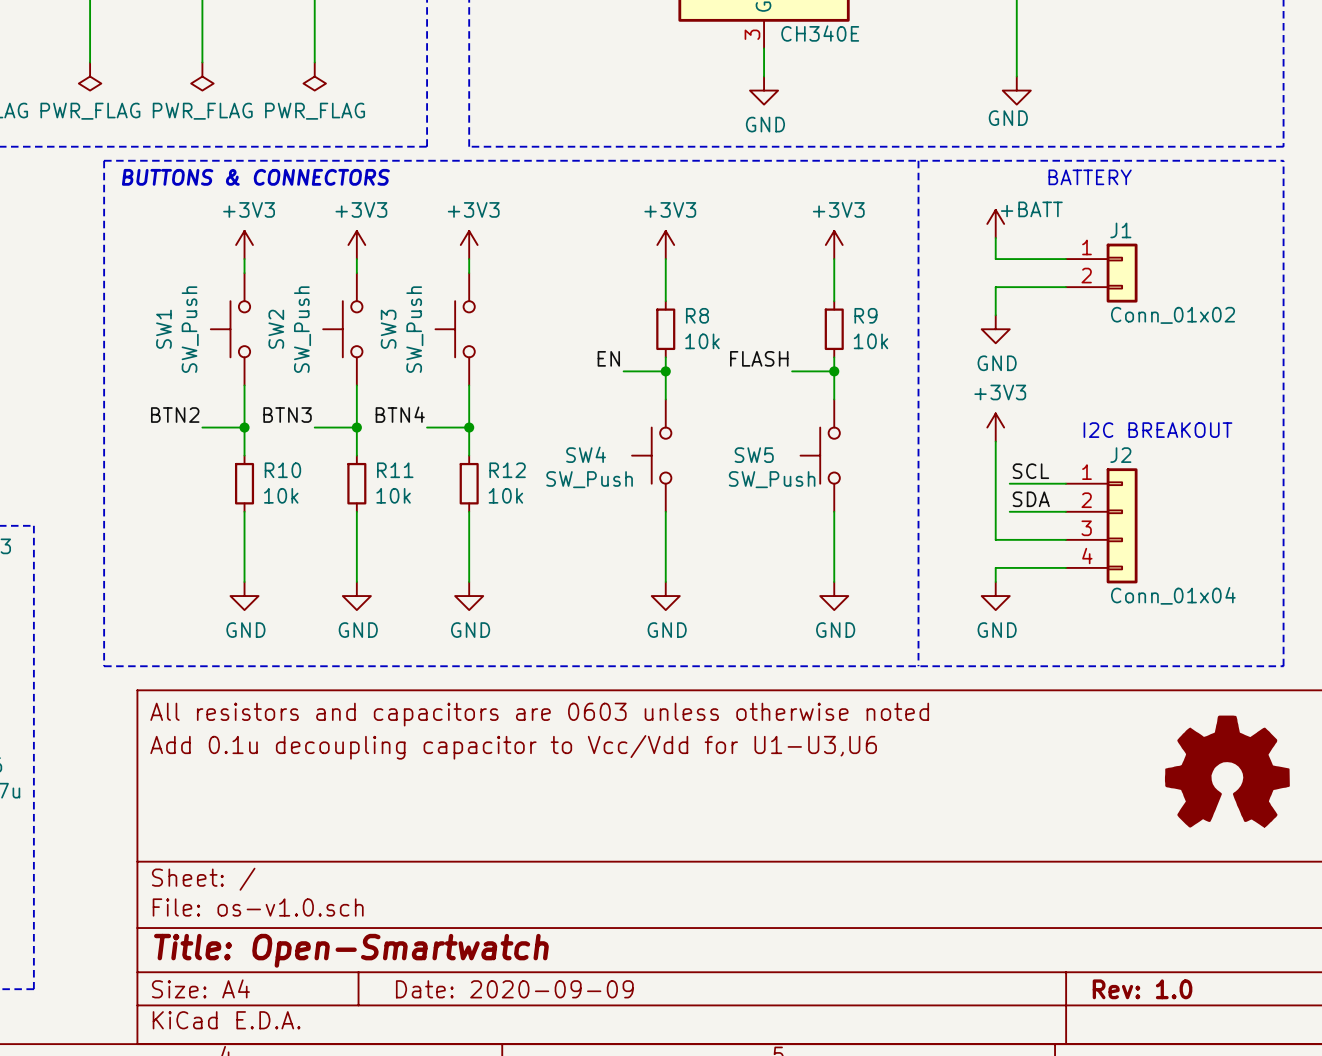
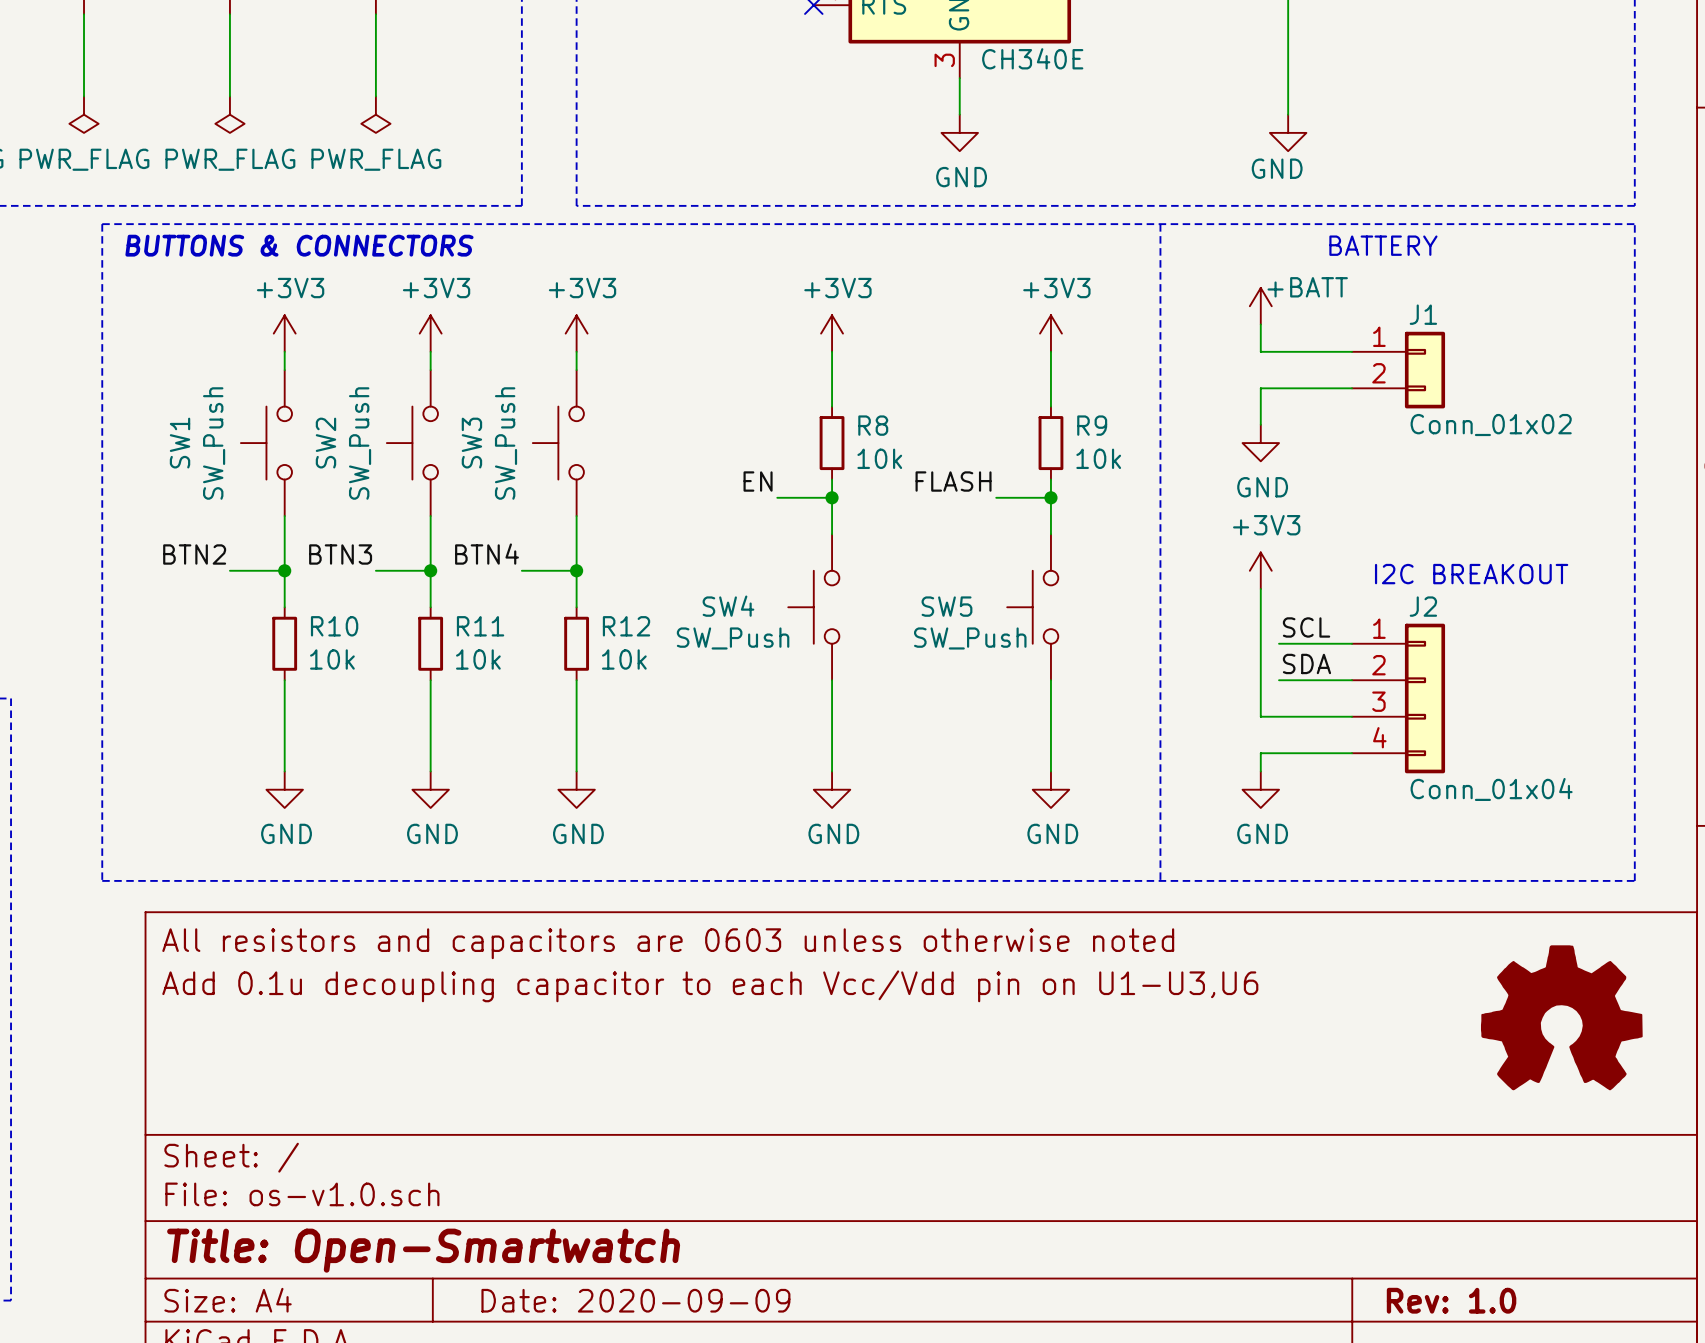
title block: Add 0.1u decoupling capacitor to Vcc/Vdd for U1-U3,U6 (513, 747) -> Add 0.1u decoupling capacitor to each Vcc/Vdd pin on U1-U3,U6 (710, 986)

